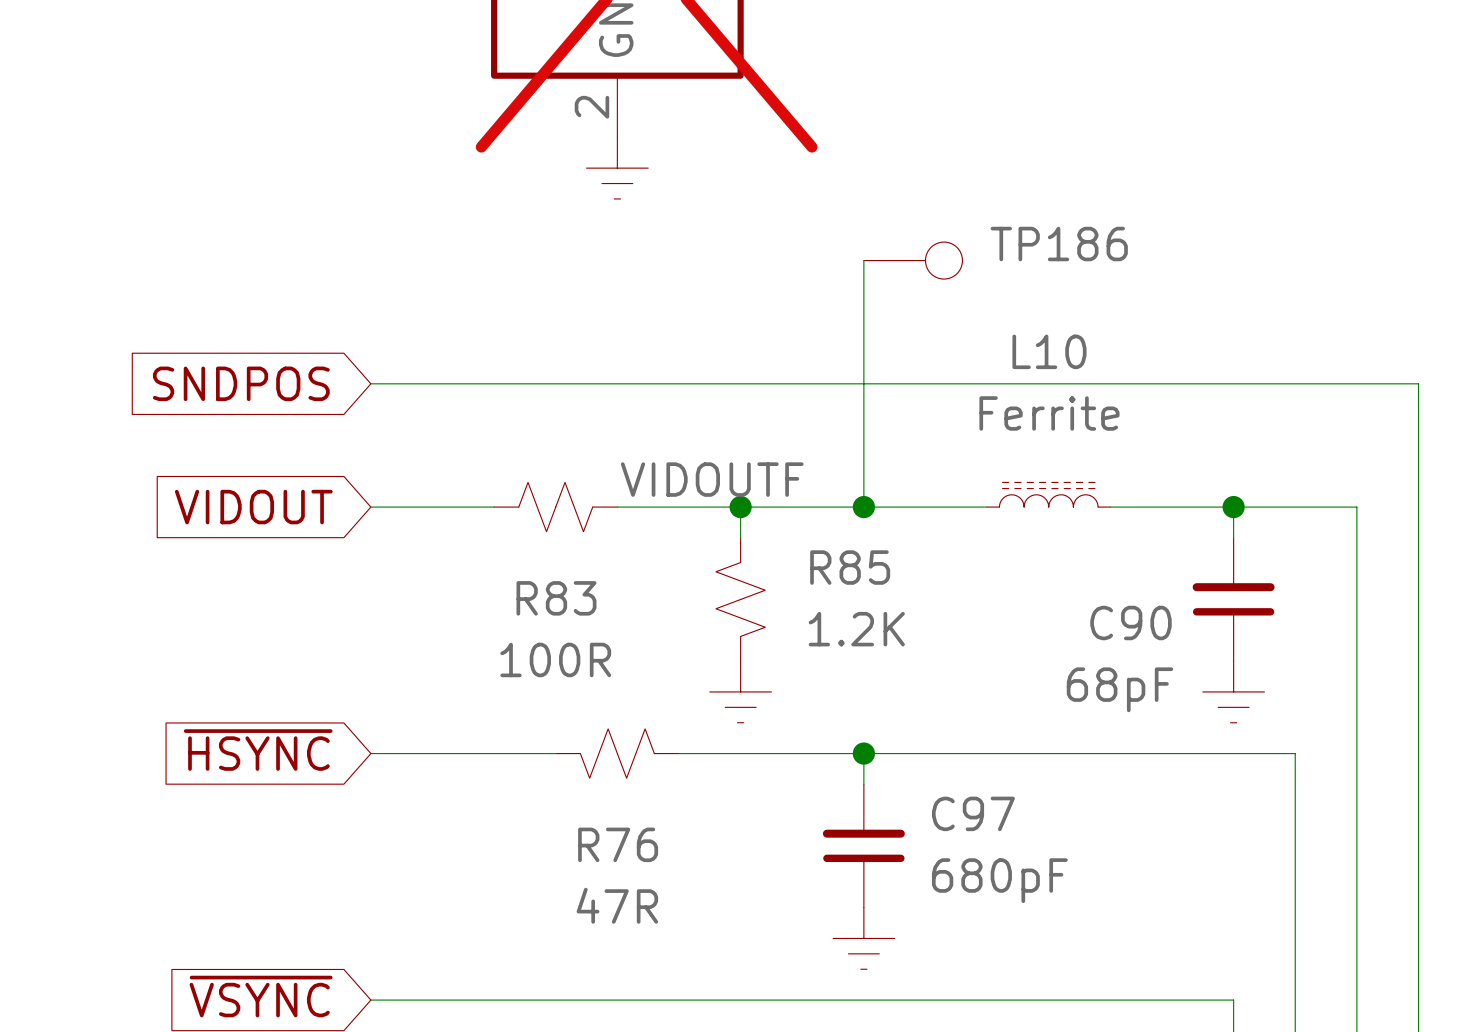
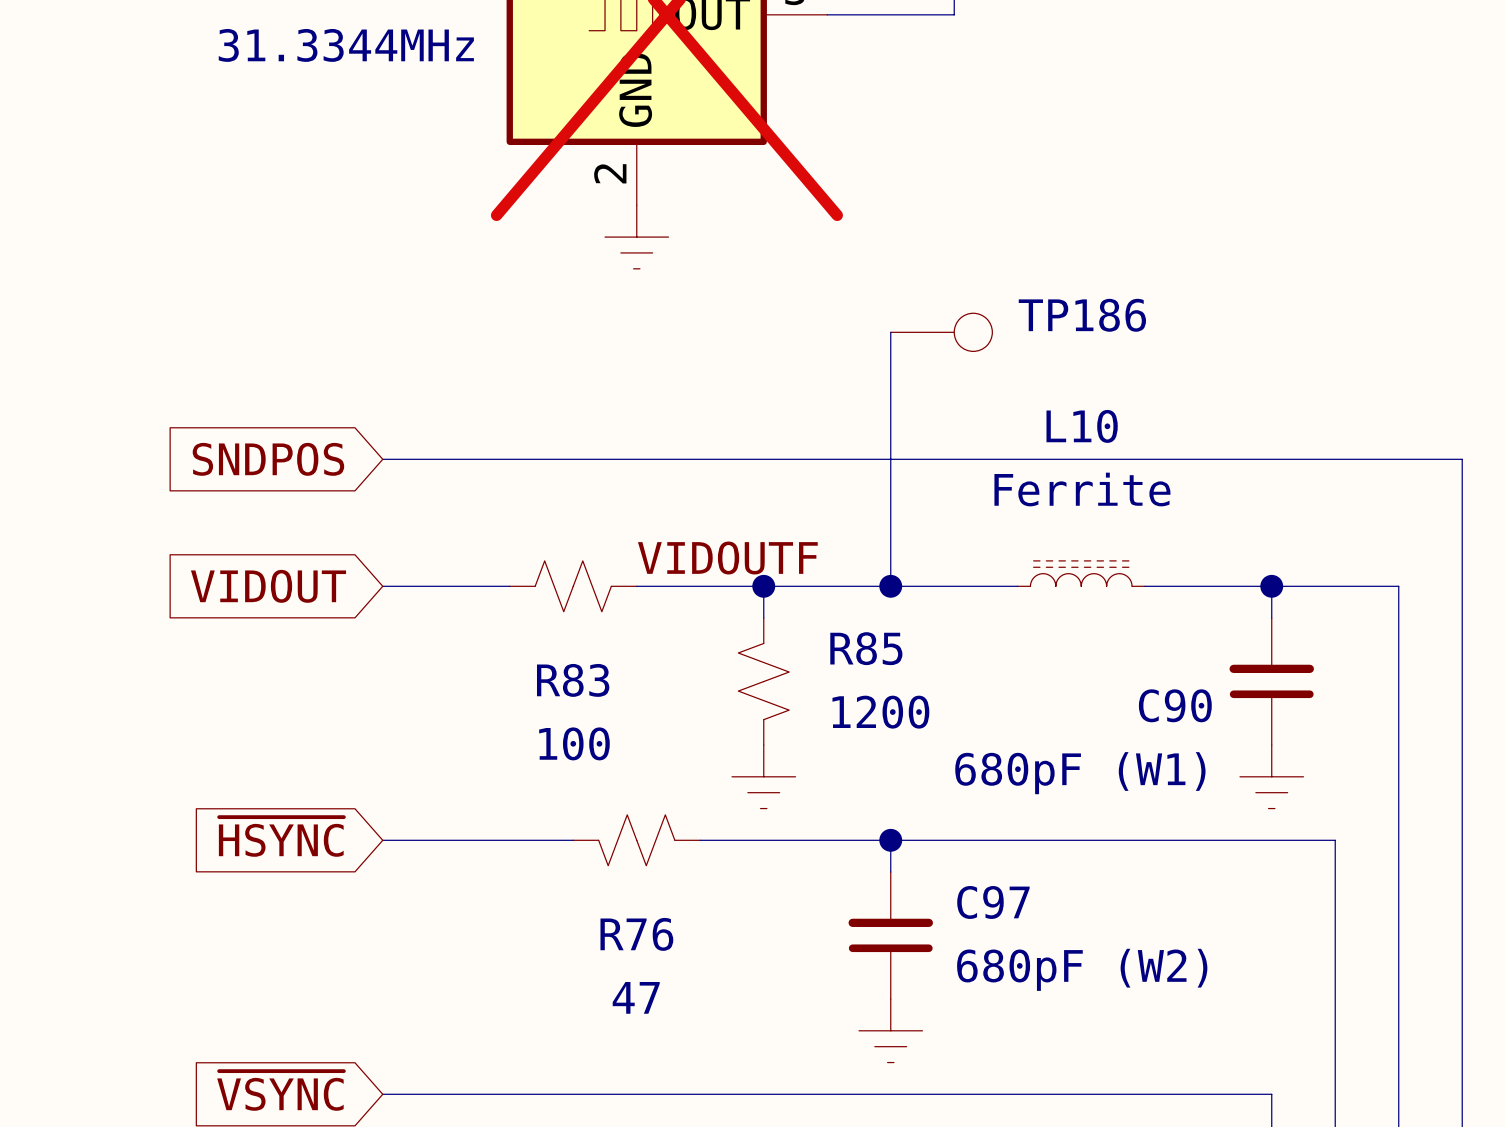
R85 value: 1.2K (856, 629) -> 1200 (880, 712)
R83 value: 100R (555, 659) -> 100 (574, 743)
C90 value: 68pF (1119, 689) -> 680pF (W1) (1080, 773)
C97 value: 680pF (999, 880) -> 680pF (W2) (1082, 969)
R76 value: 47R (617, 905) -> 47 (636, 997)

